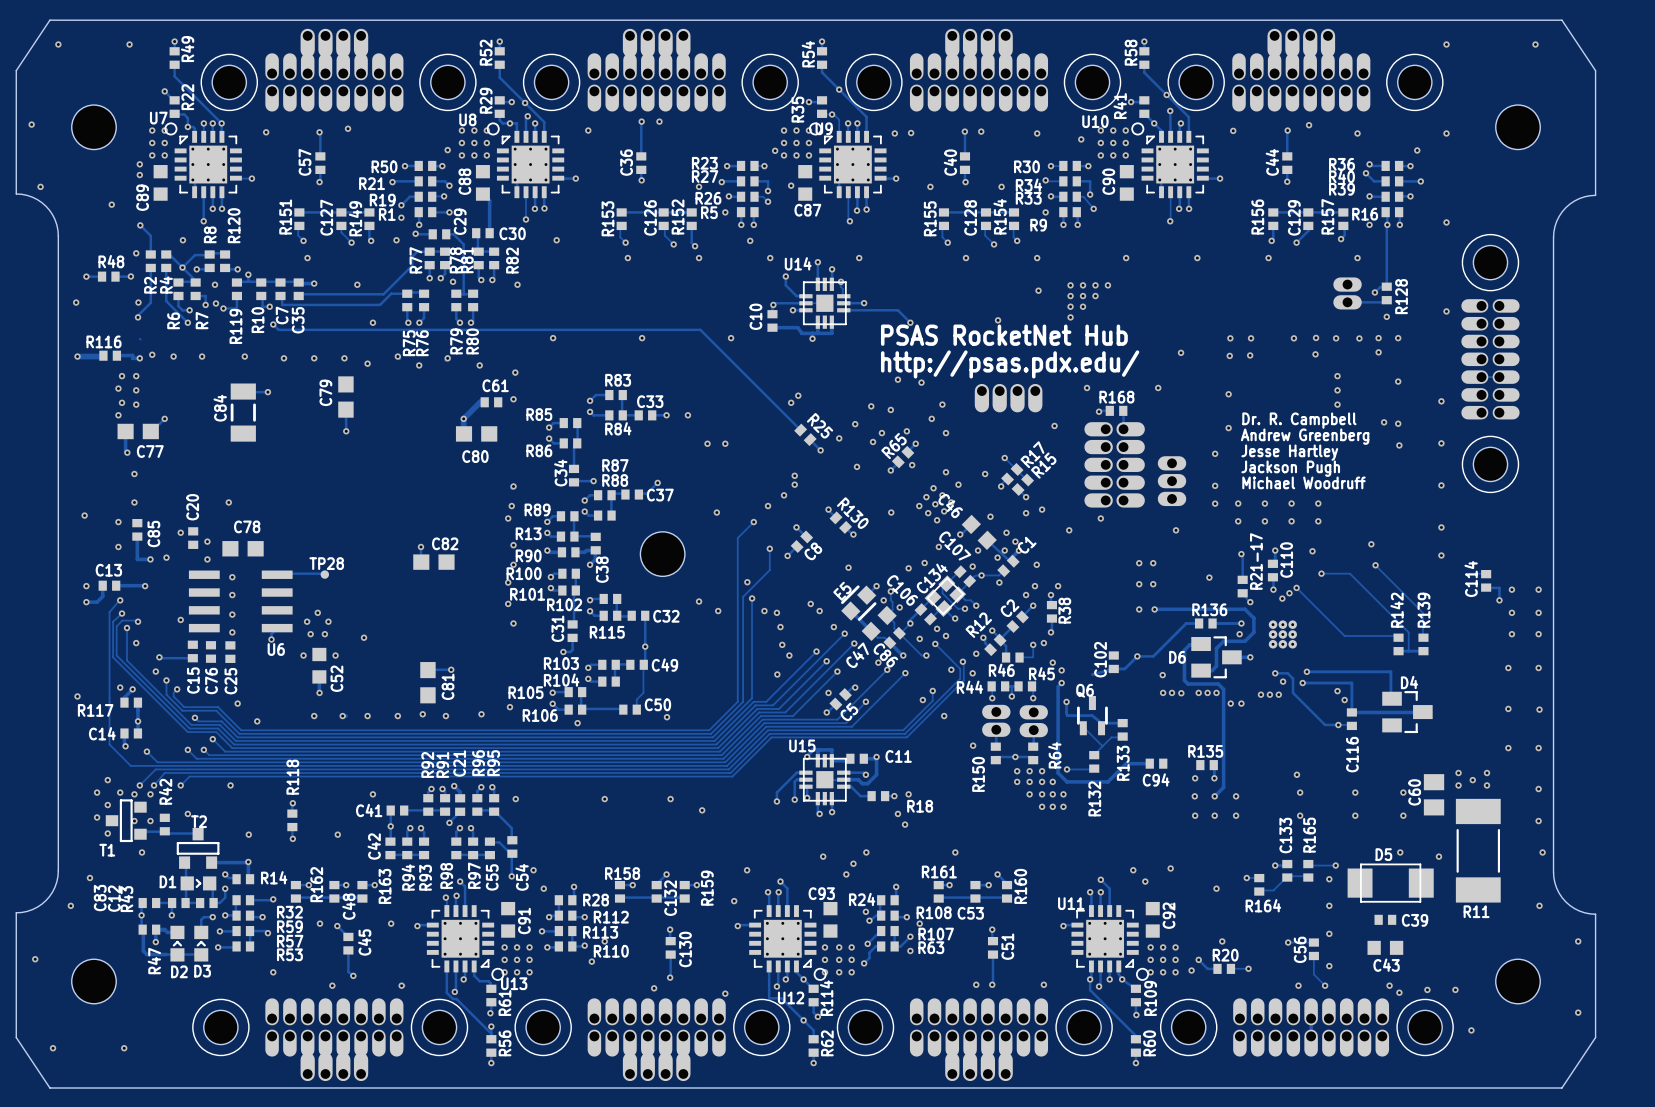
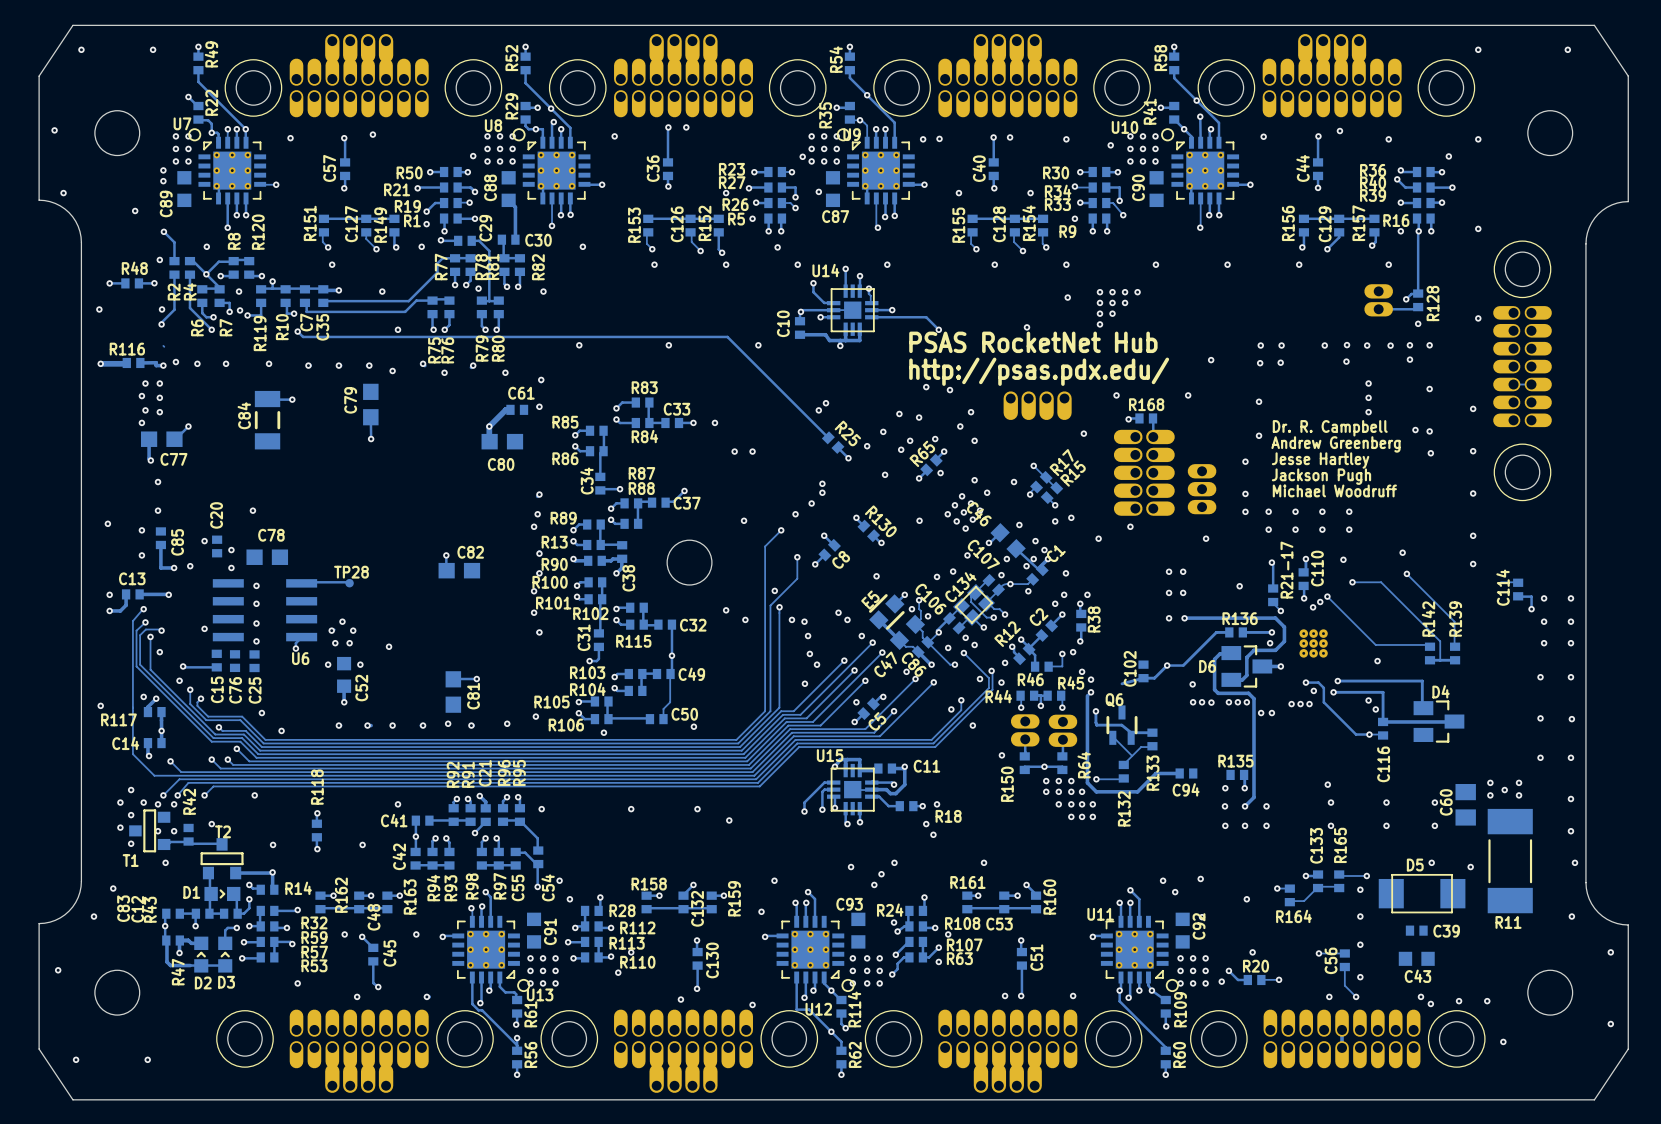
via: none -> (1377, 661)

